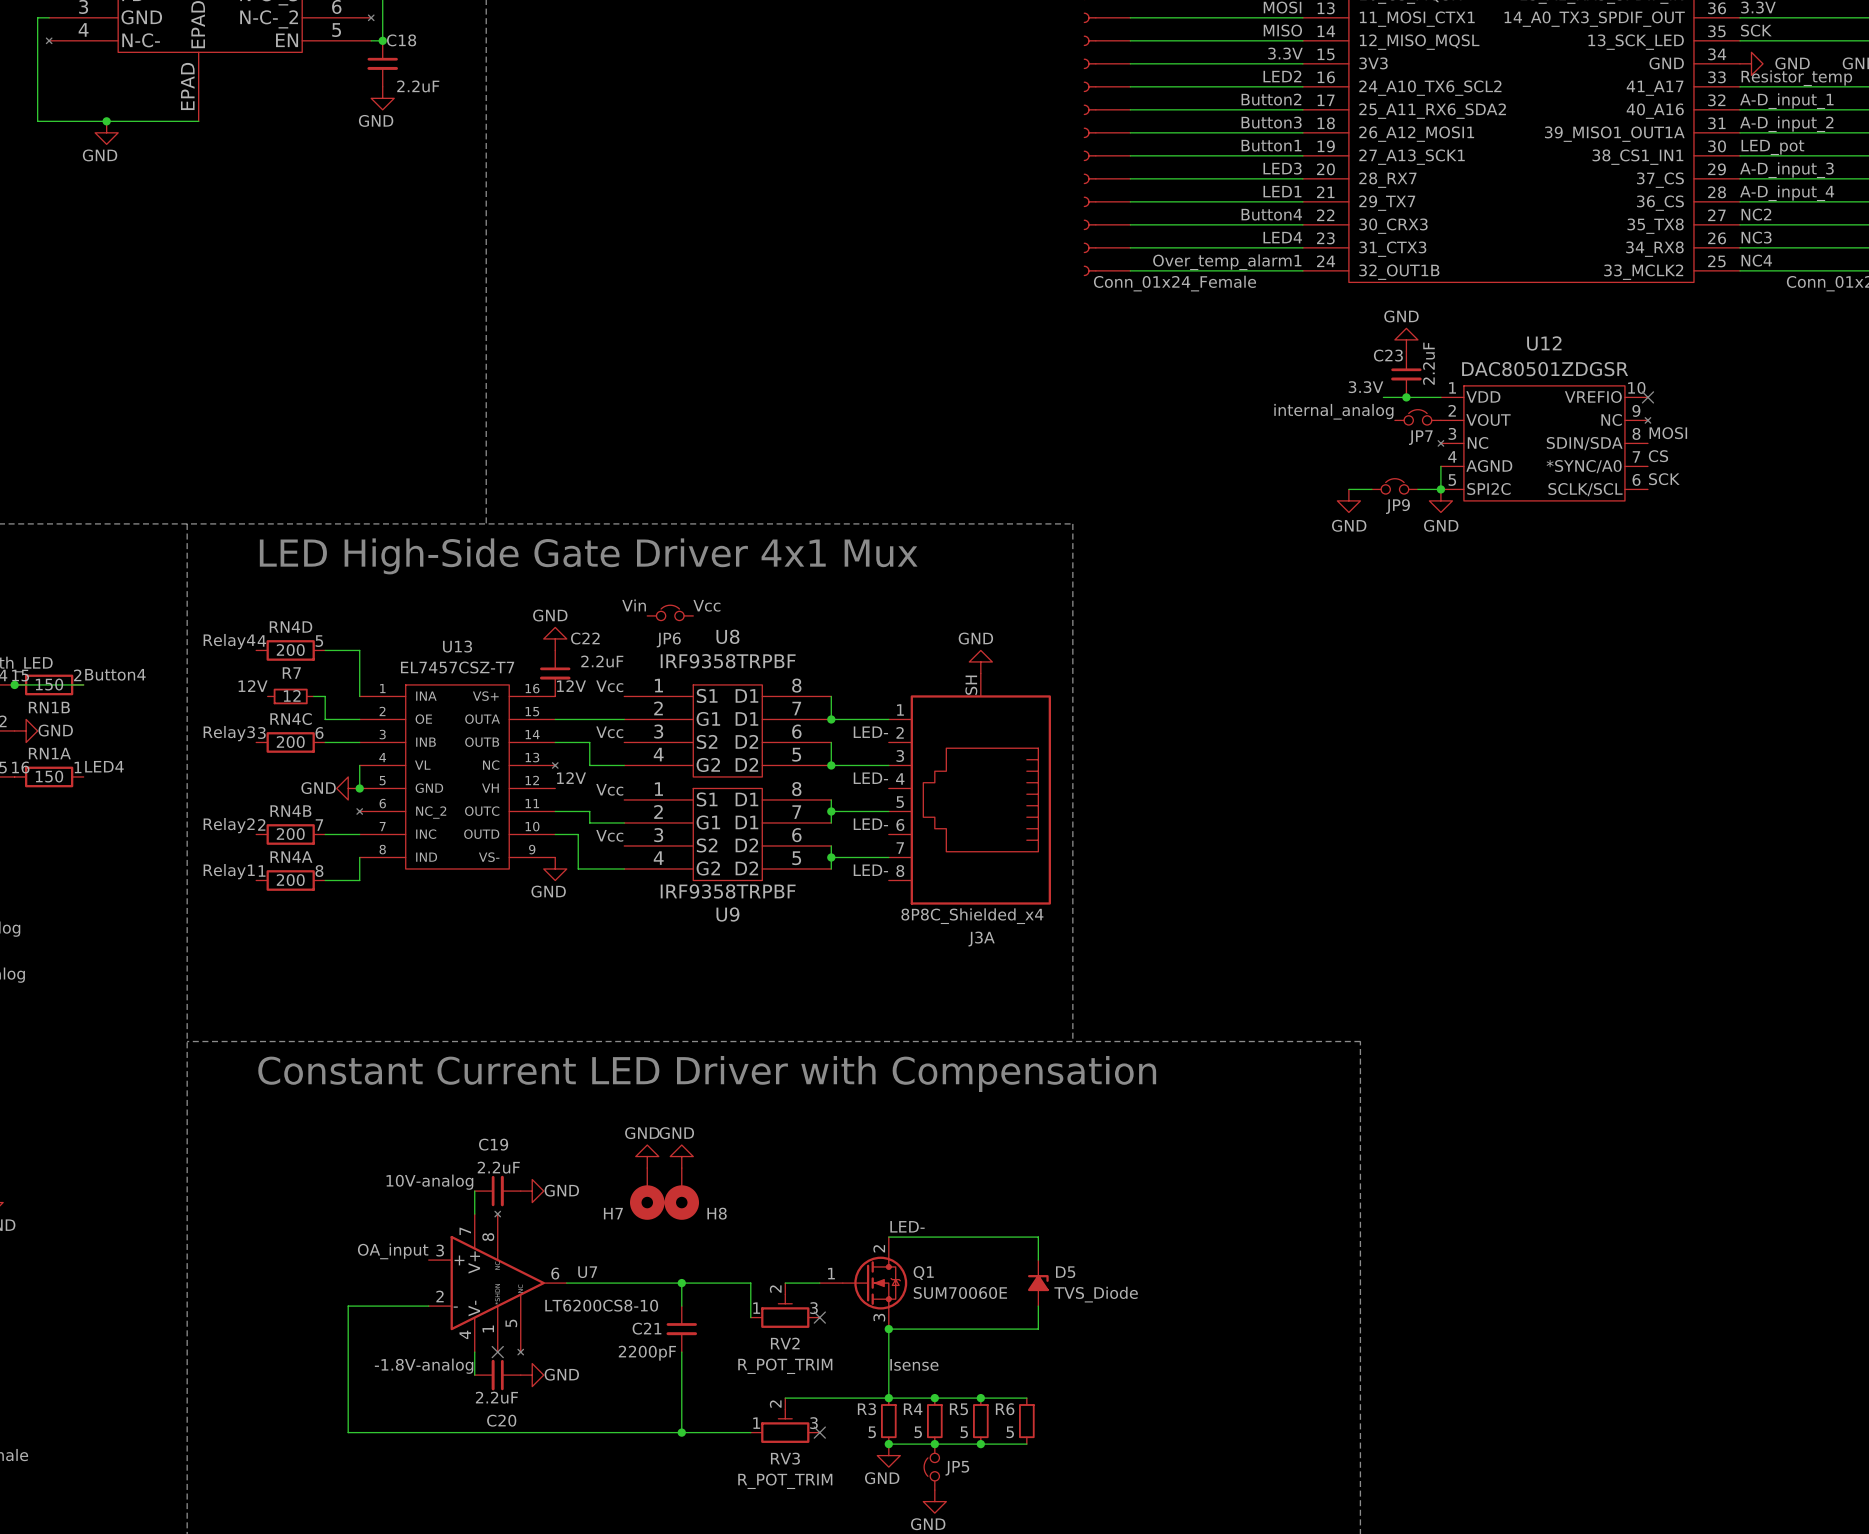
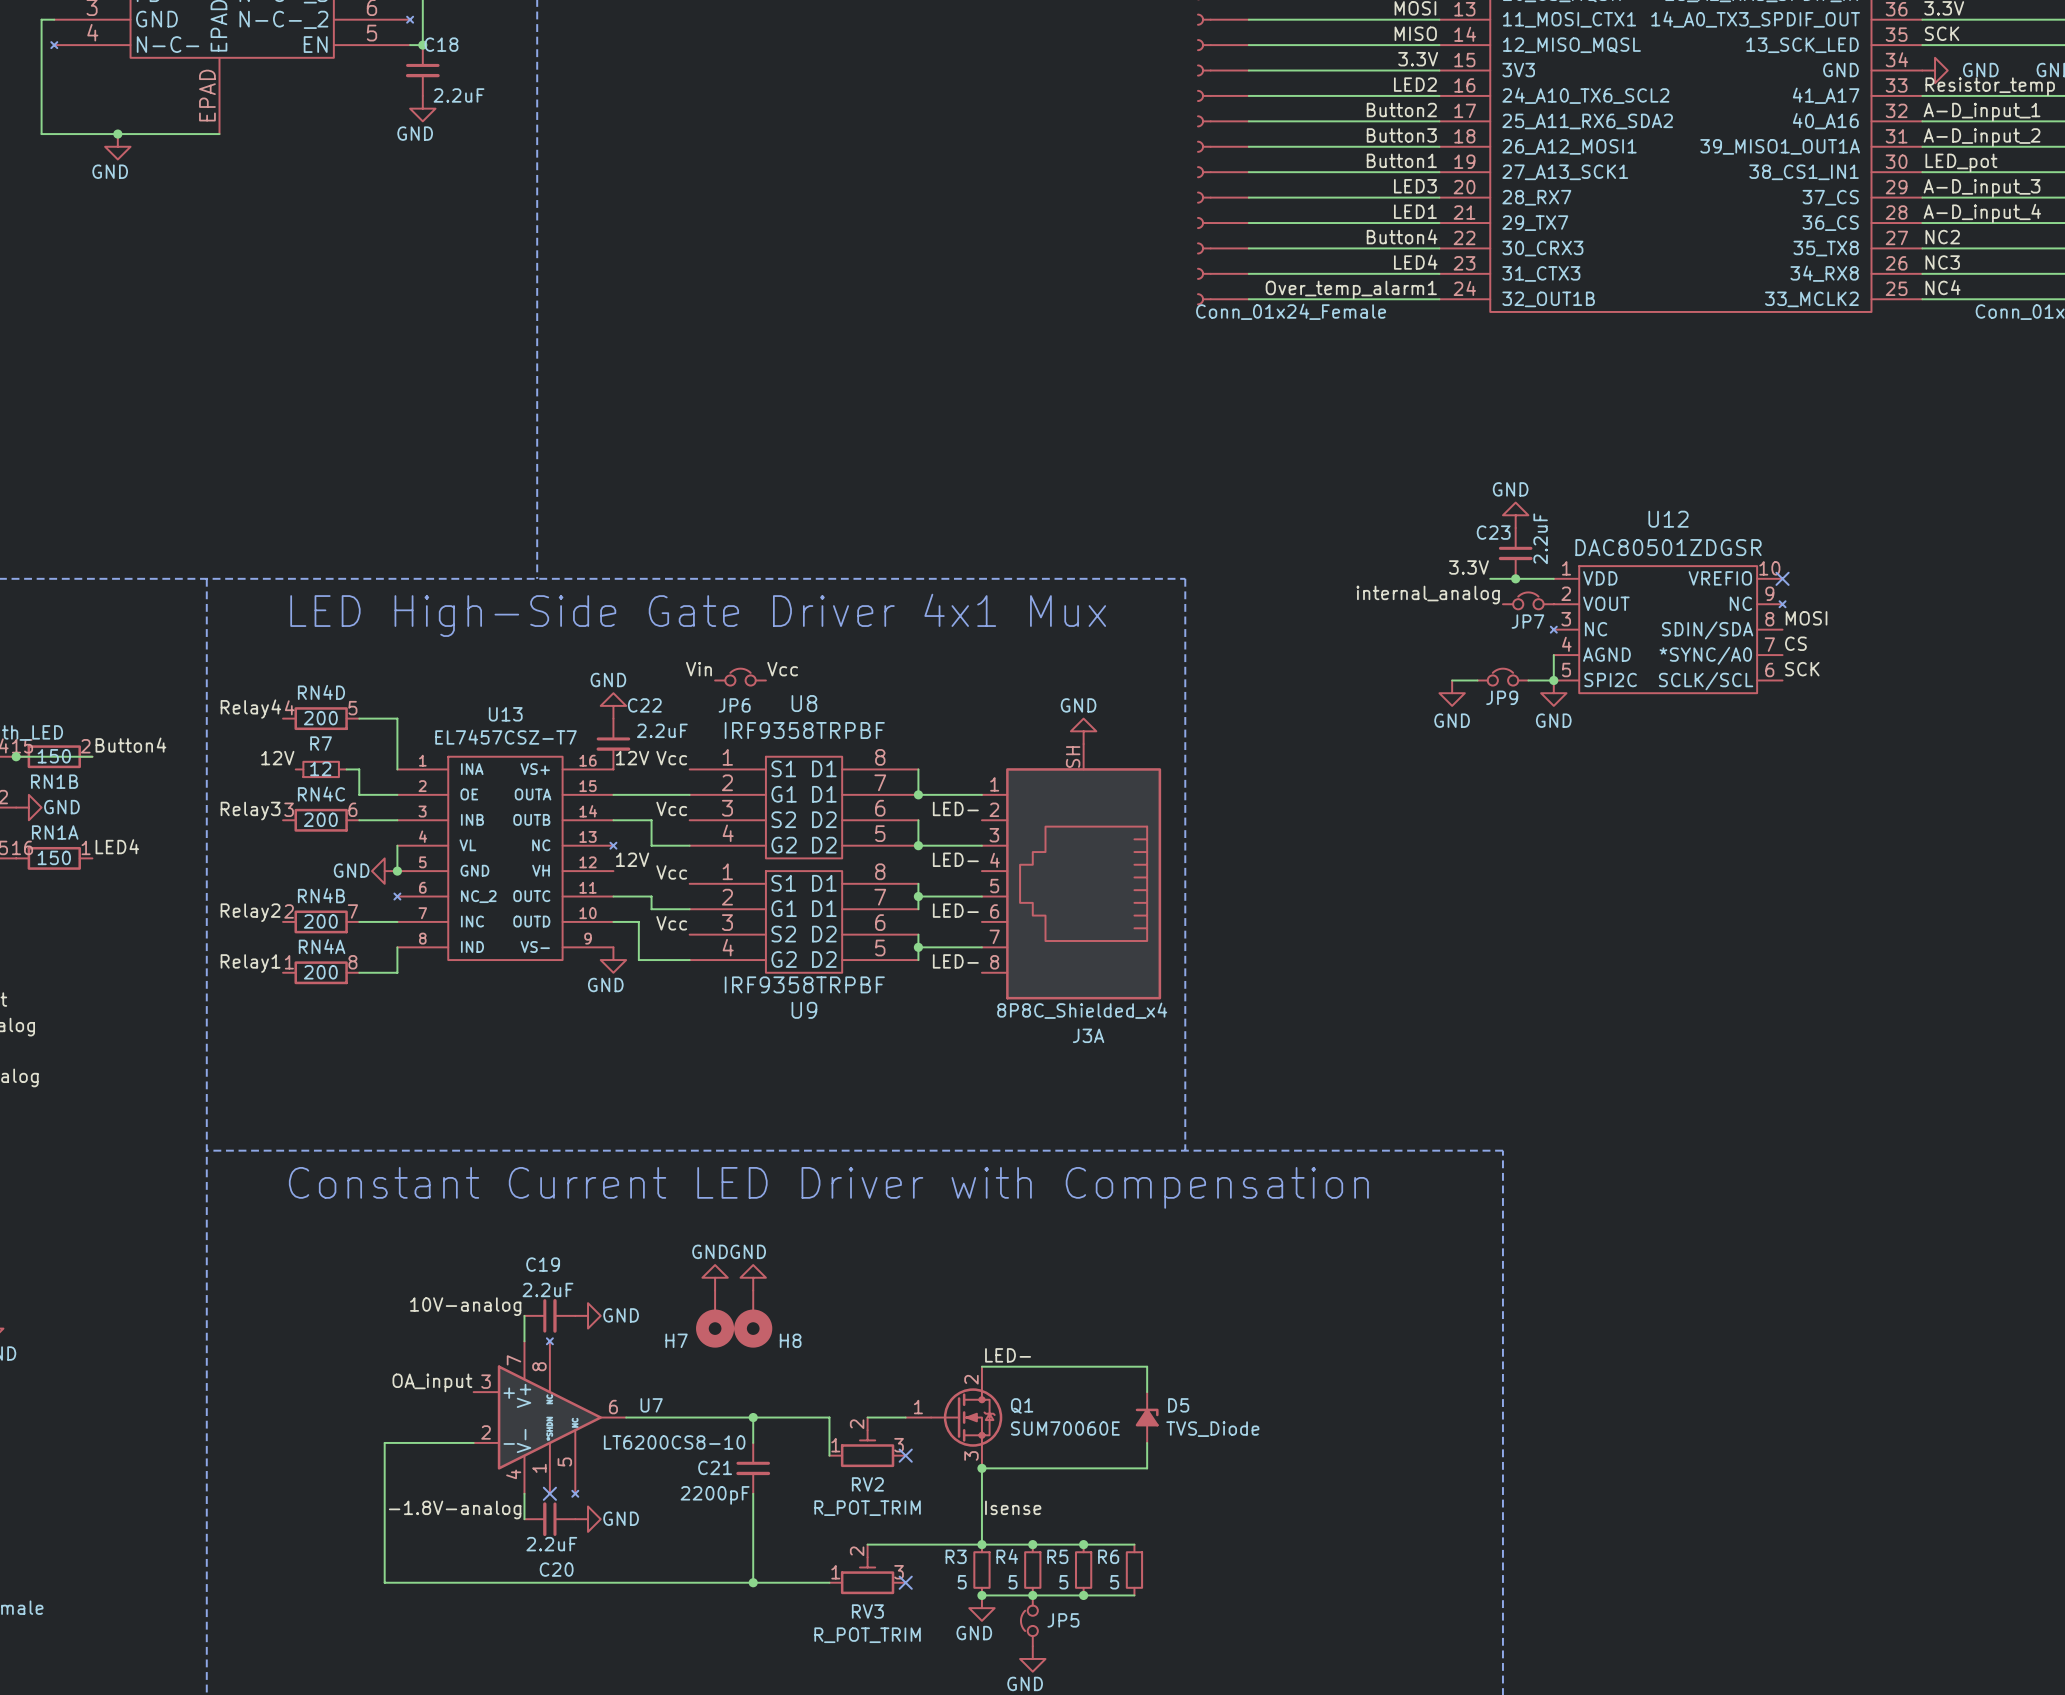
power symbol: GND (1406, 339) -> none
C23 position: (1406, 374) -> (1515, 553)
label position: 3.3V (1366, 387) -> 3.3V (1468, 567)
wire: (1383, 397) (1440, 397) -> (1490, 578) (1553, 578)
junction: (1406, 397) -> none
no-connect mark: (1647, 397) -> none
label position: internal_analog (1333, 411) -> internal_analog (1428, 595)
JP7 position: (1417, 417) -> (1528, 600)
label position: MOSI (1668, 433) -> MOSI (1806, 618)
U12 position: (1544, 443) -> (1668, 629)
label position: CS (1658, 456) -> CS (1795, 643)
power symbol: none -> GND (1515, 515)
wire: (1440, 466) (1440, 489) (1417, 489) -> (1553, 655) (1553, 680) (1528, 680)
label position: SCK (1664, 479) -> SCK (1802, 669)
JP9 position: (1394, 486) -> (1502, 677)
wire: (1348, 489) (1371, 489) -> (1452, 680) (1477, 680)
junction: (1440, 489) -> none
power symbol: GND (1348, 500) -> none
power symbol: GND (1440, 500) -> none
junction: none -> (1515, 578)
no-connect mark: none -> (1782, 578)
junction: none -> (1553, 680)
power symbol: none -> GND (1452, 693)
power symbol: none -> GND (1553, 693)

